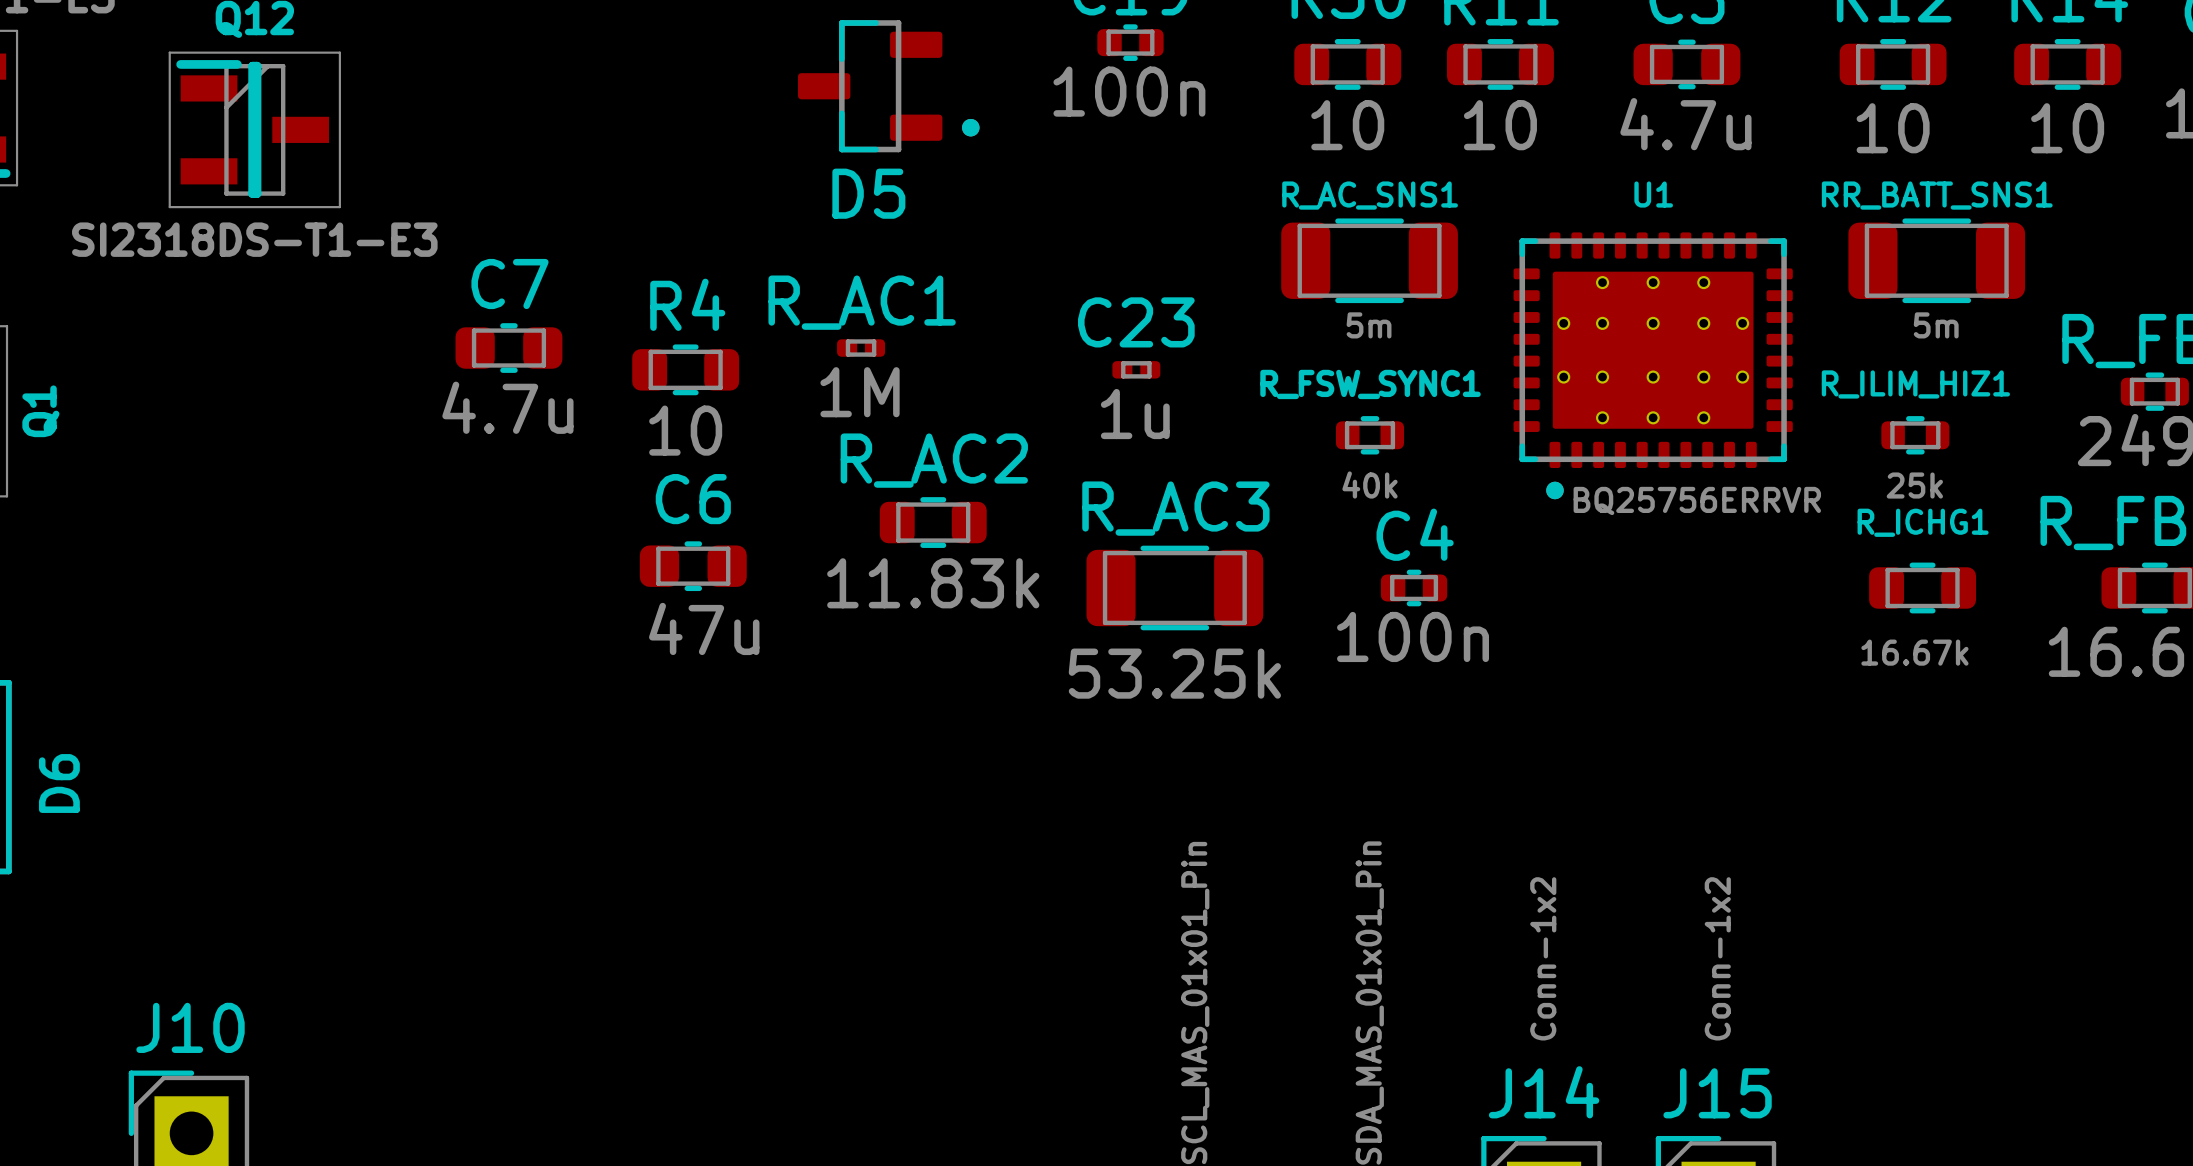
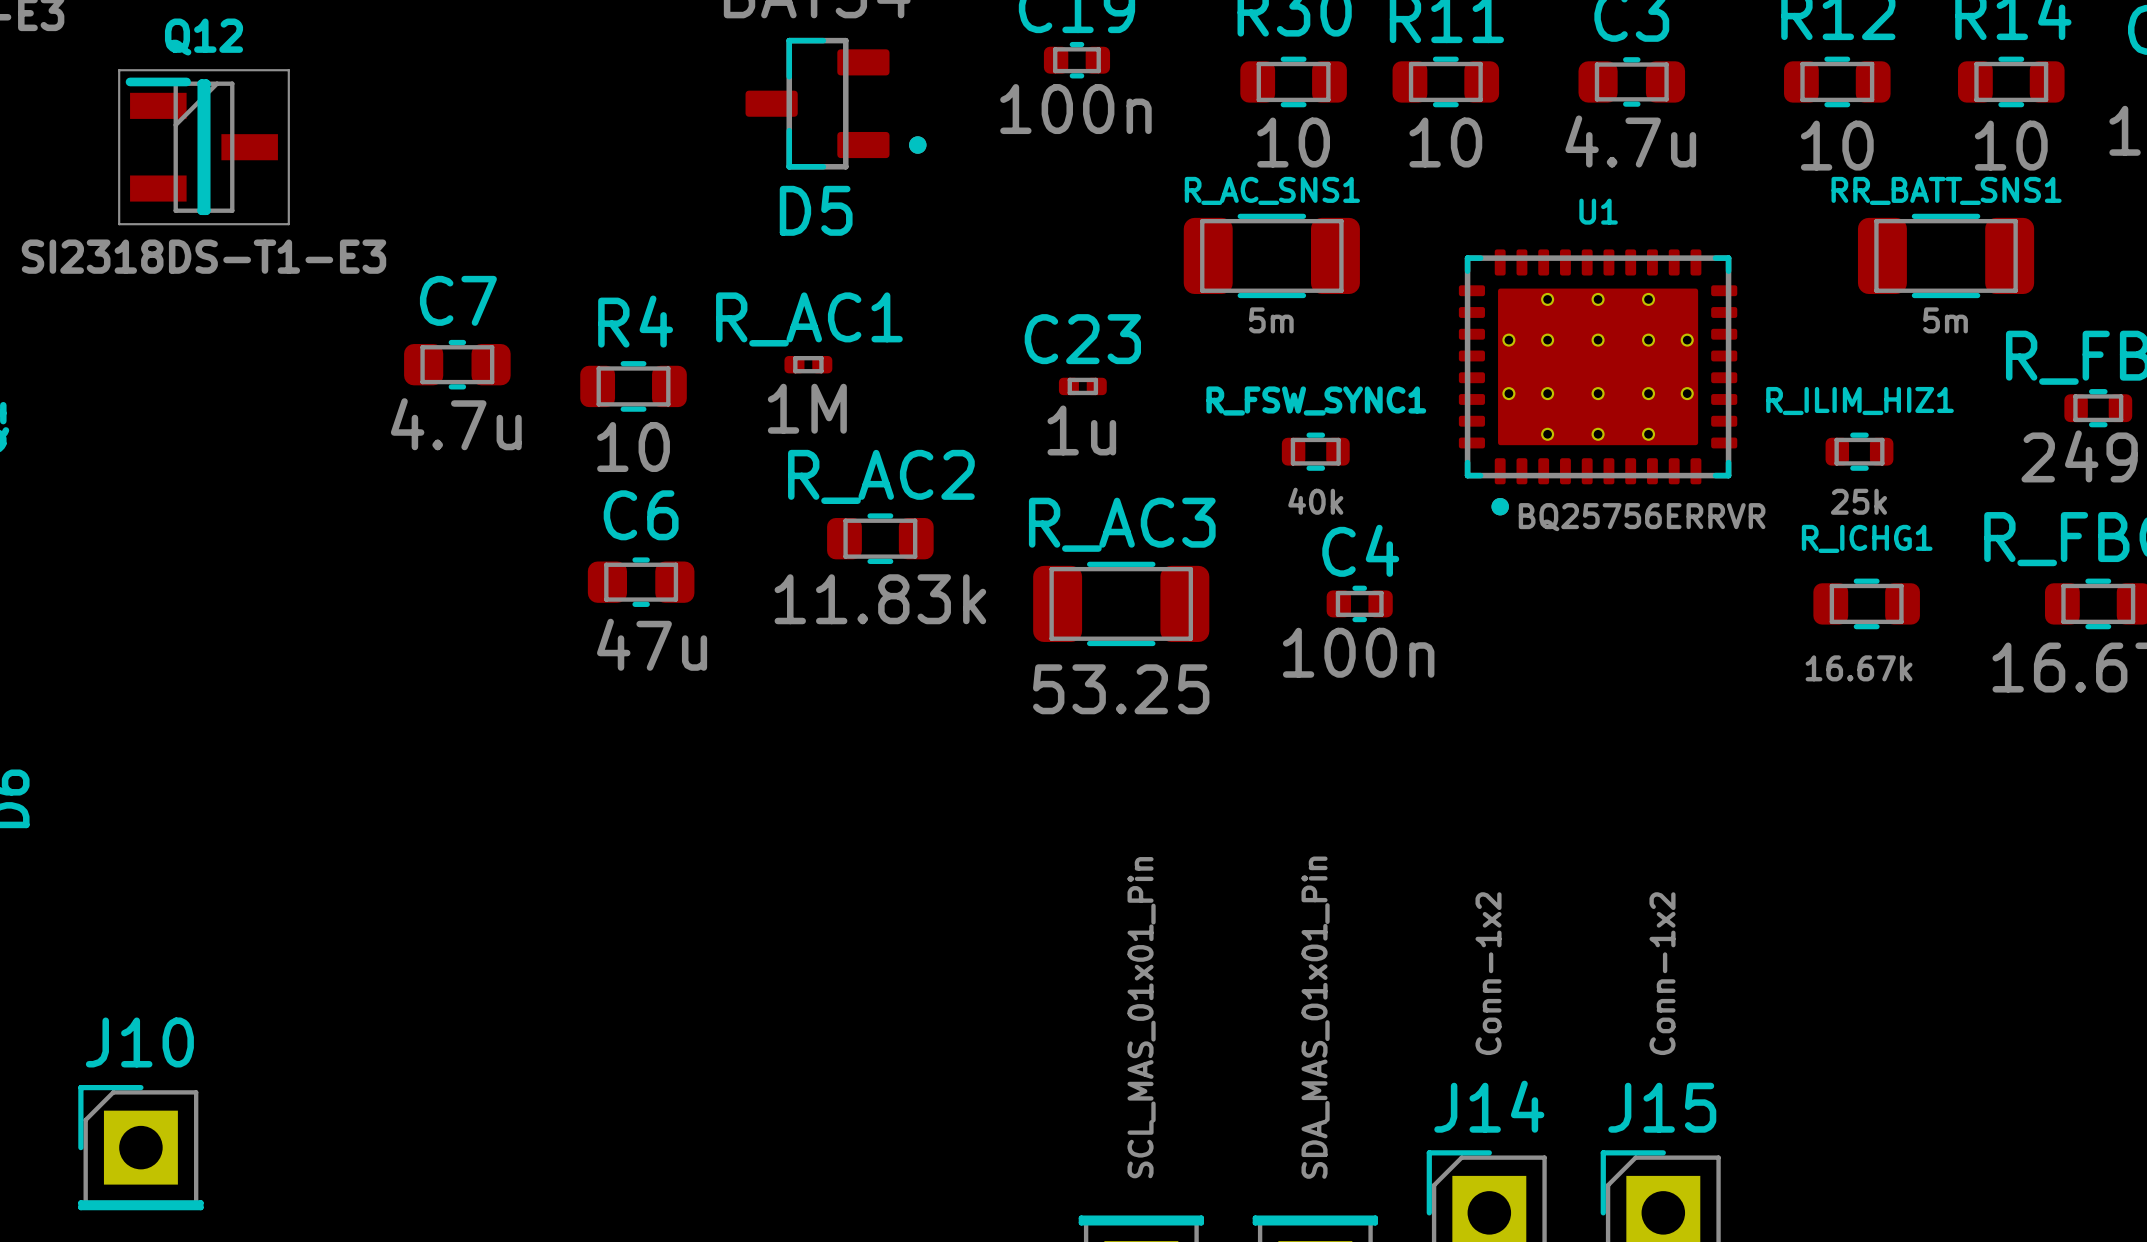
R_AC_SNS1 position: (1369, 260) -> (1271, 255)
RR_BATT_SNS1 position: (1936, 260) -> (1946, 255)
R_AC3 value: 53.25k (1174, 673) -> 53.25 (1121, 689)

